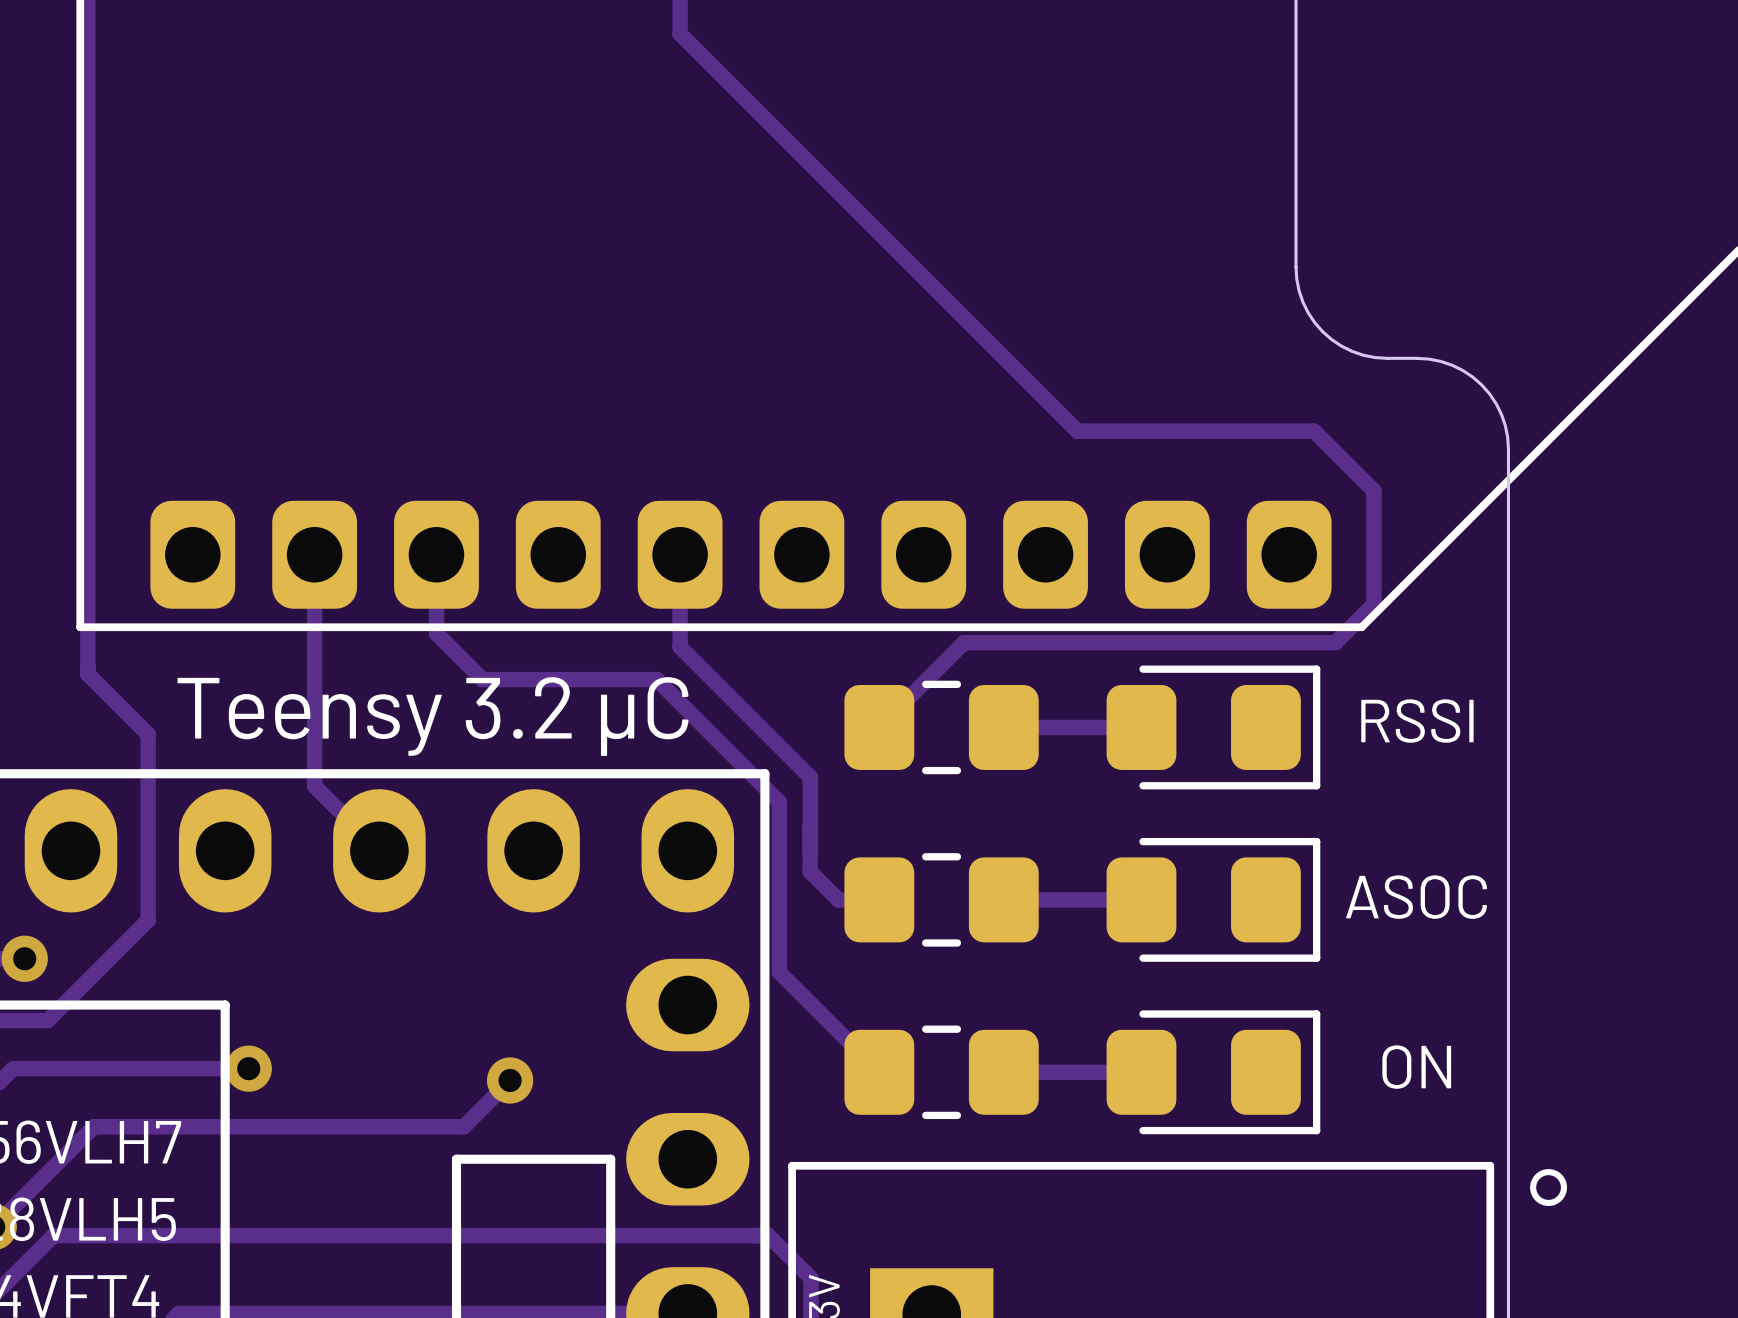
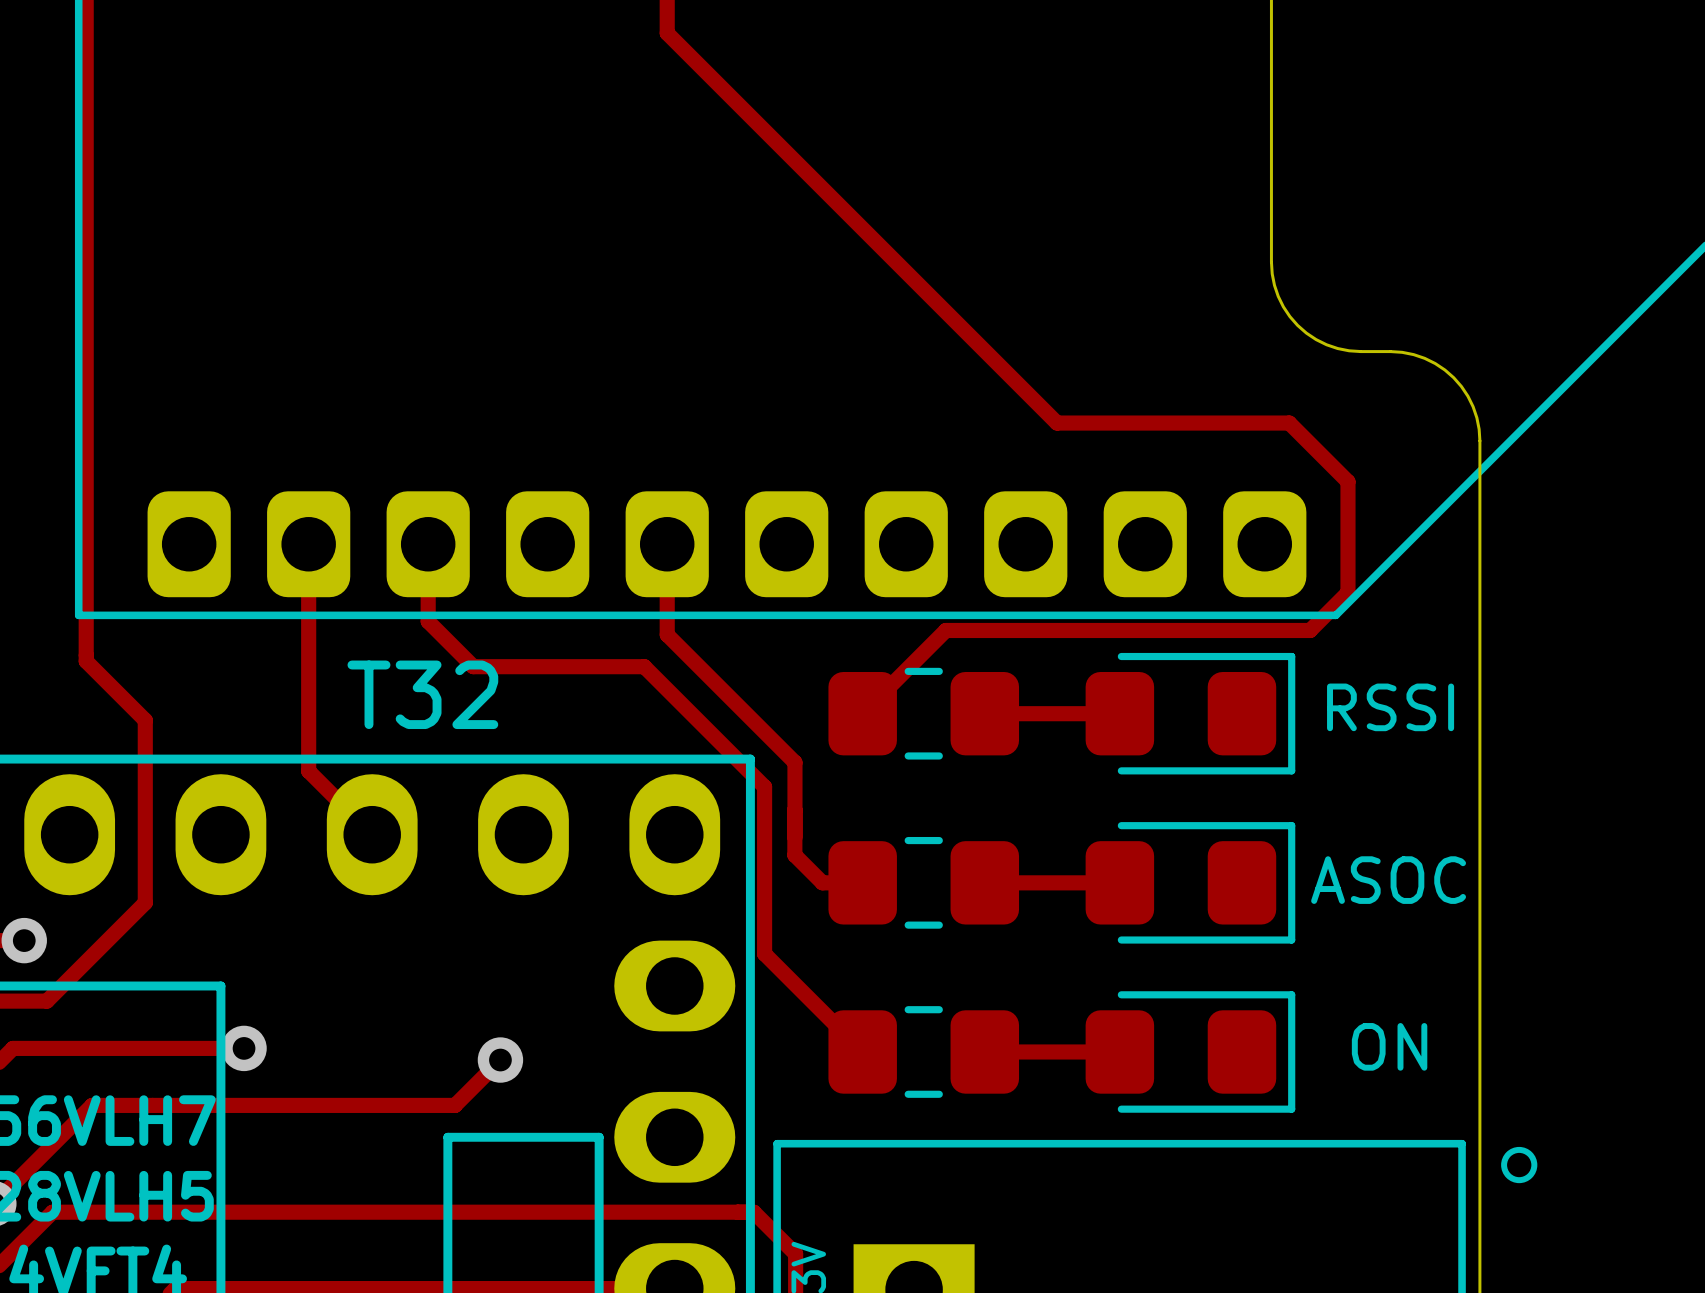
Teensy 3.2 µC name: Teensy 3.2 µC (432, 716) -> T32 (422, 694)

